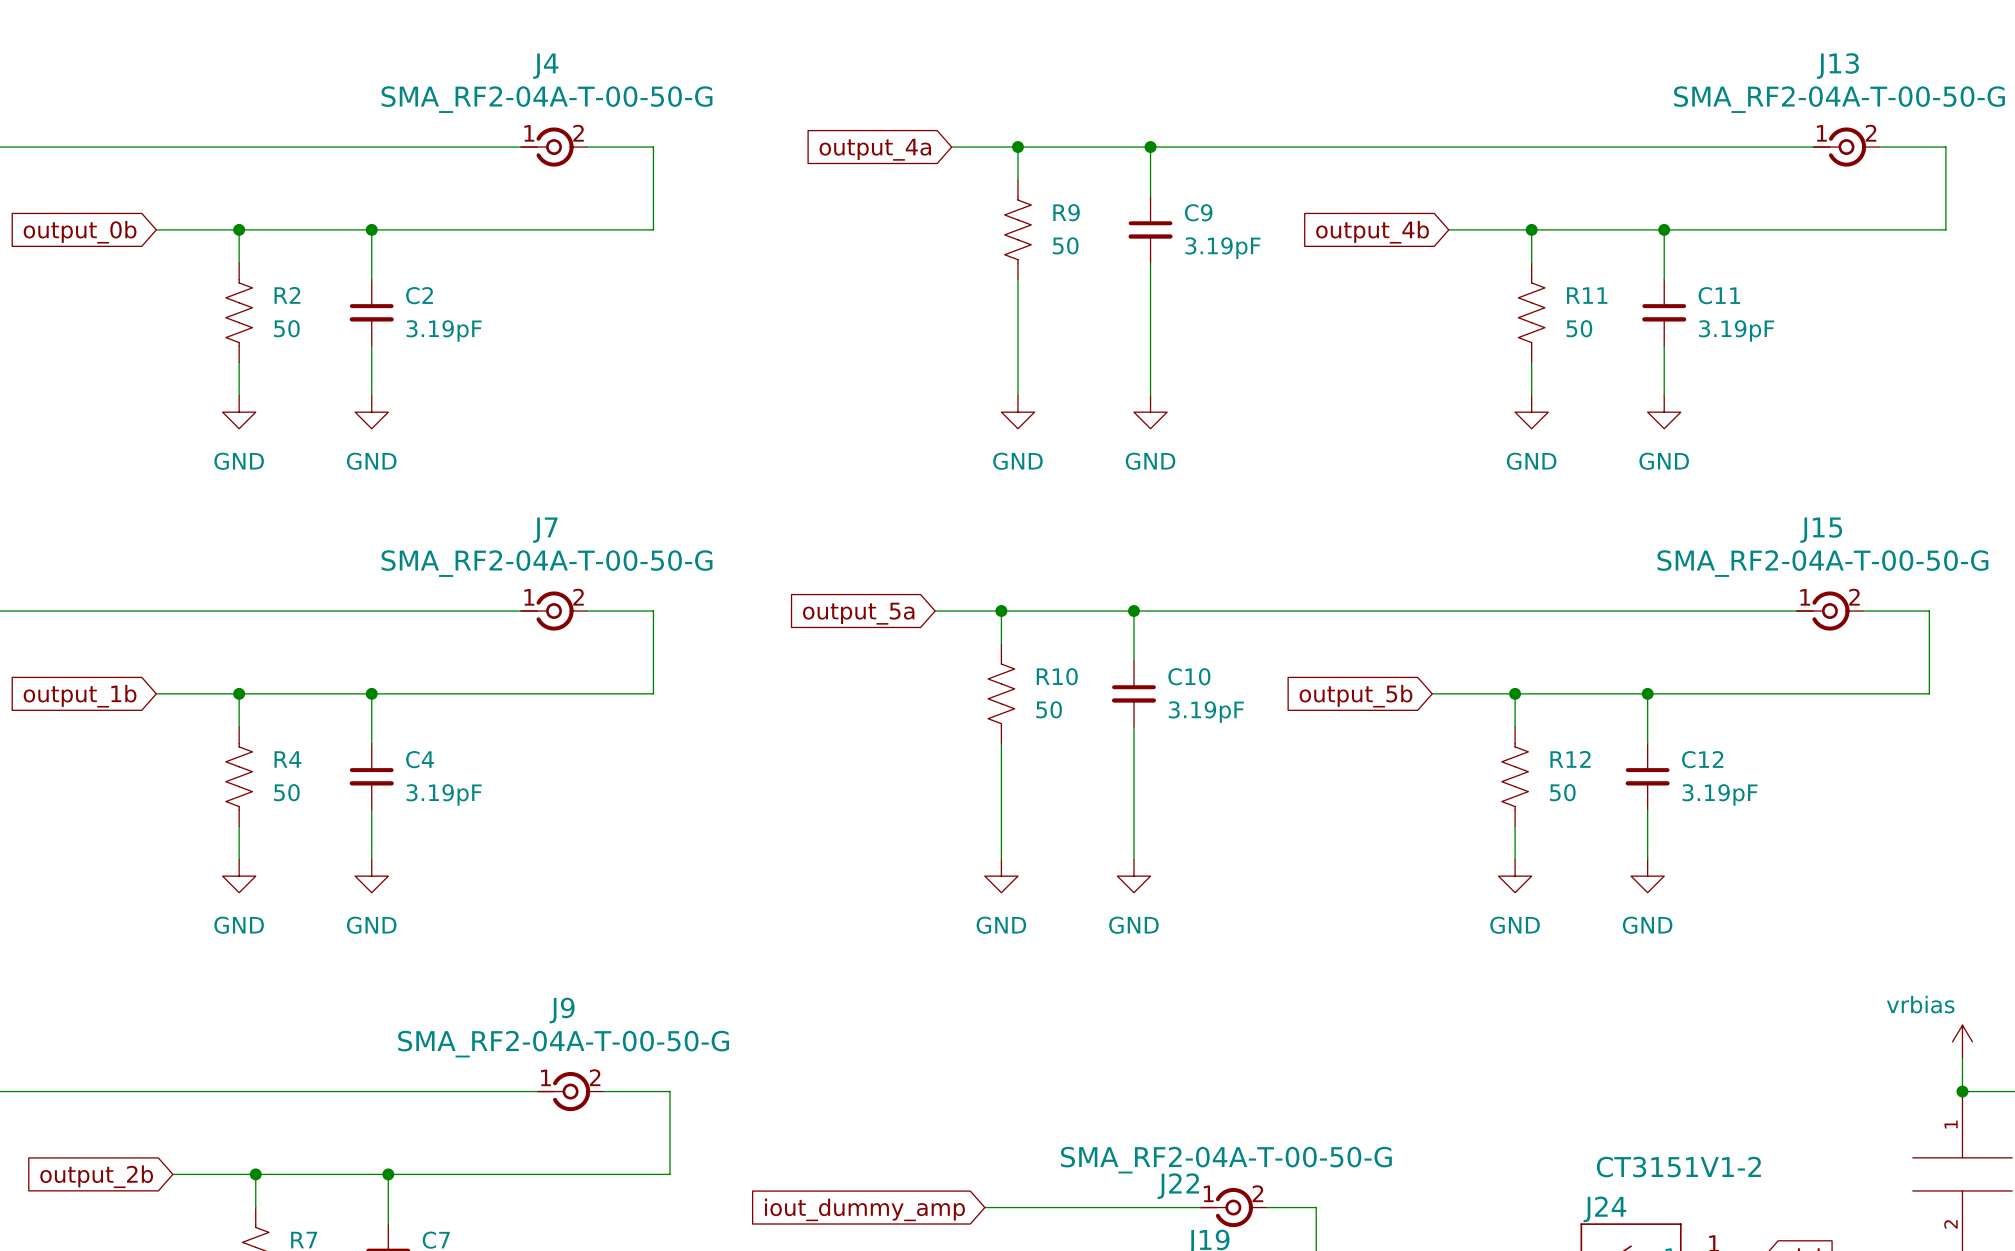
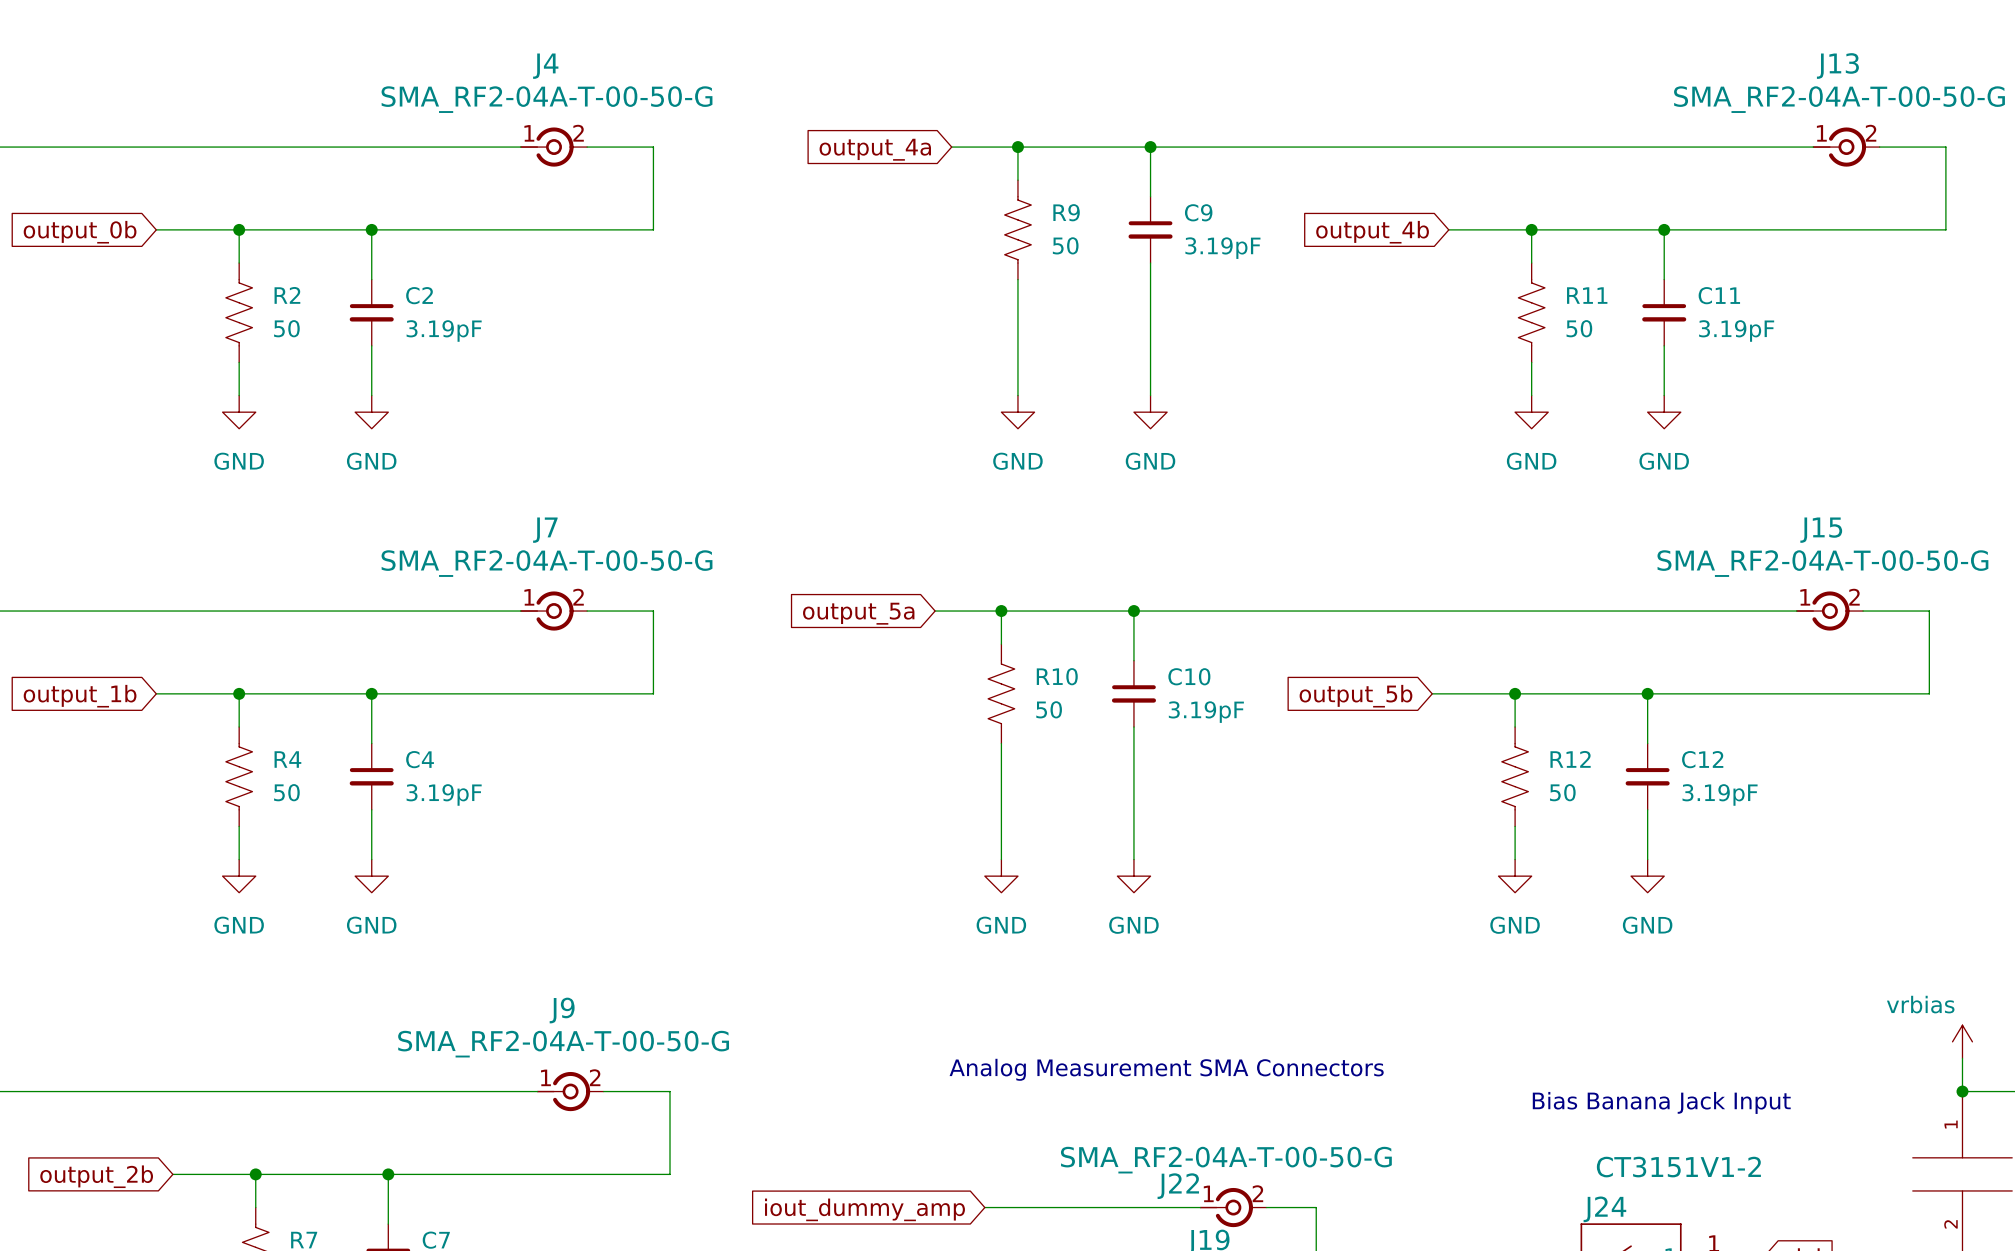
text: none -> Analog Measurement SMA Connectors (1166, 1069)
text: none -> Bias Banana Jack Input (1661, 1102)

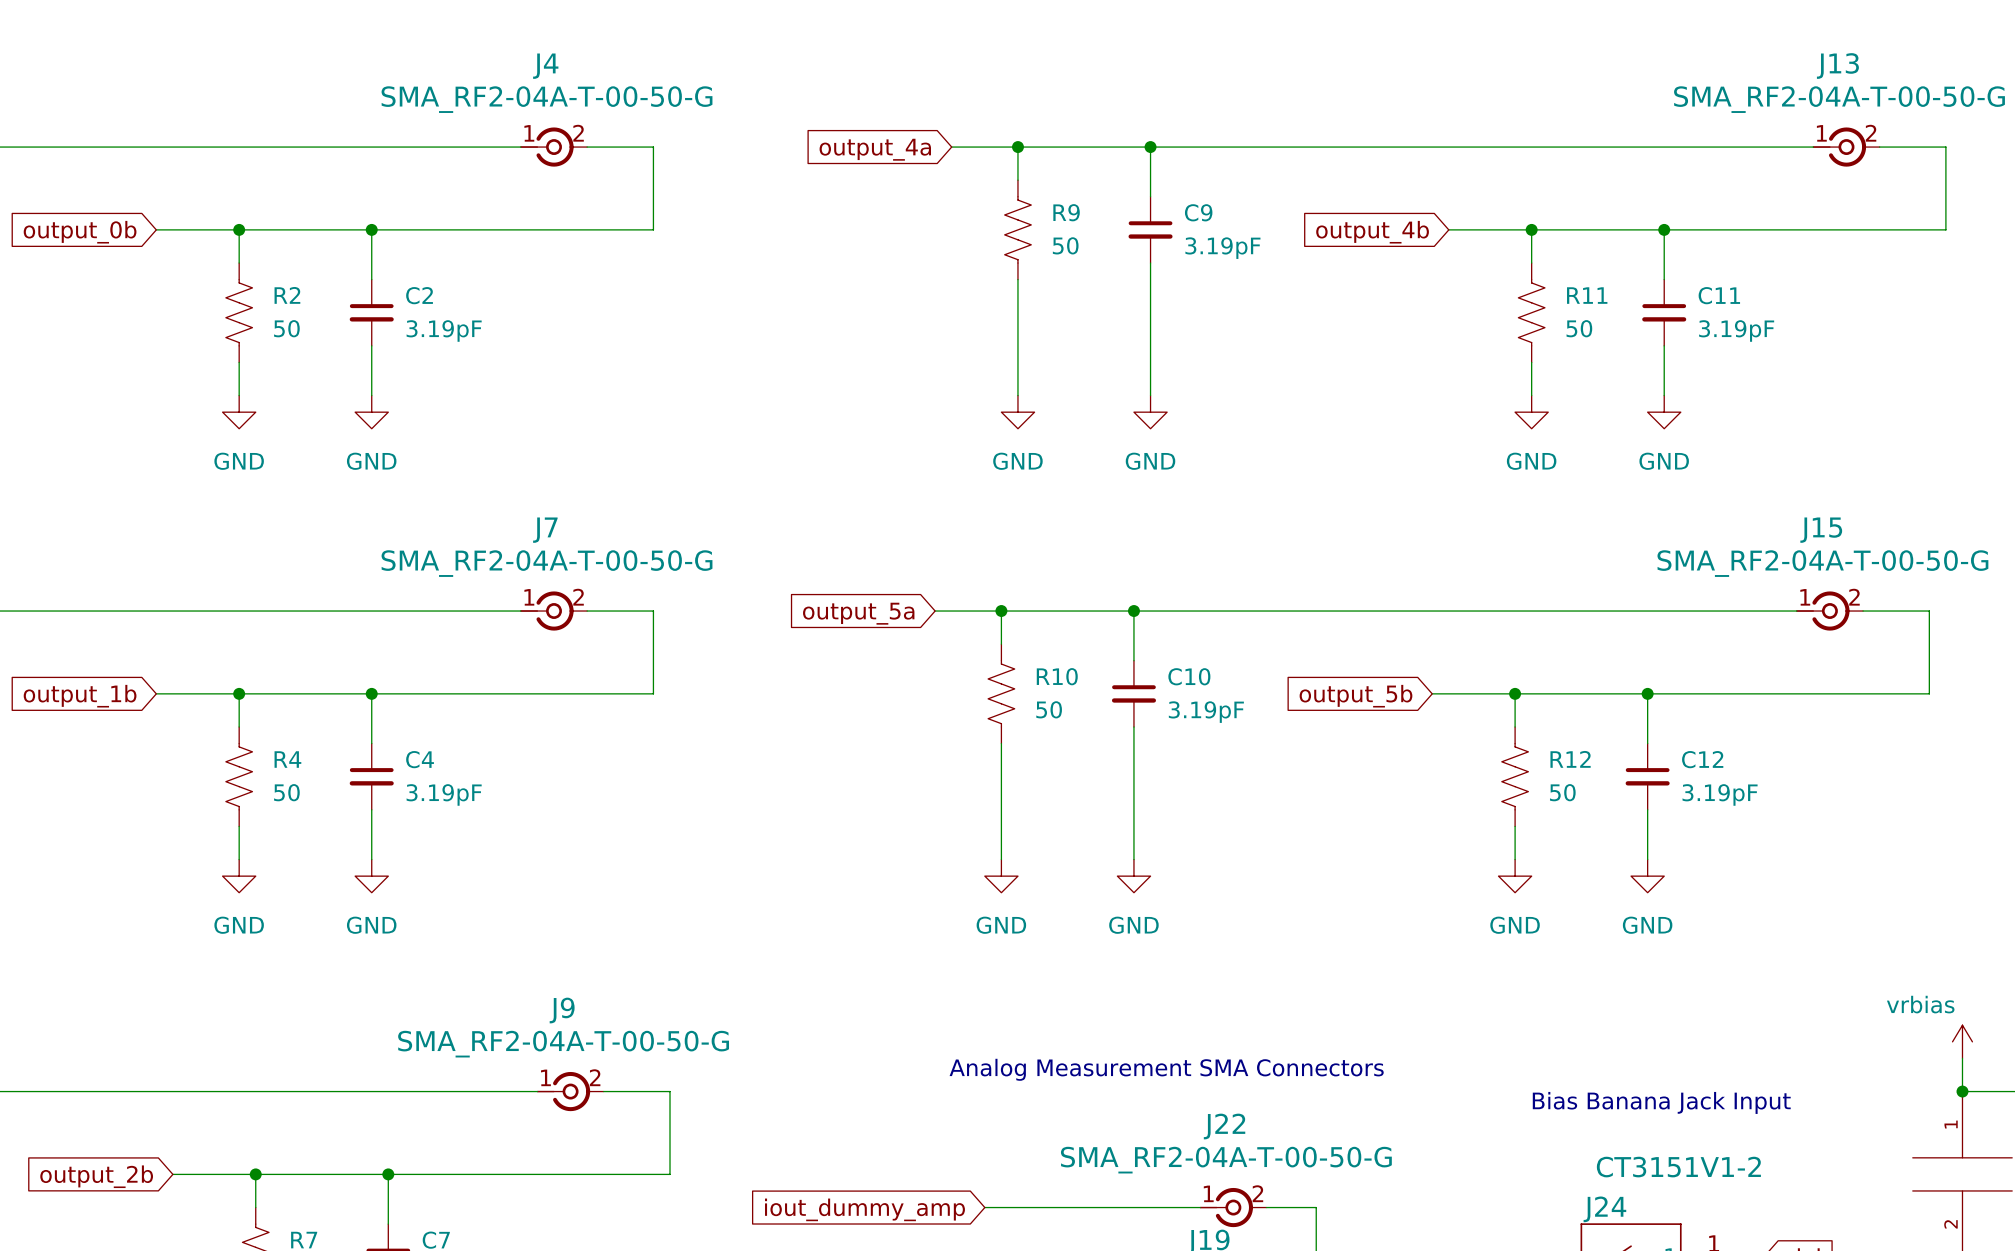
J22 name position: J22 (1178, 1186) -> J22 (1224, 1126)

